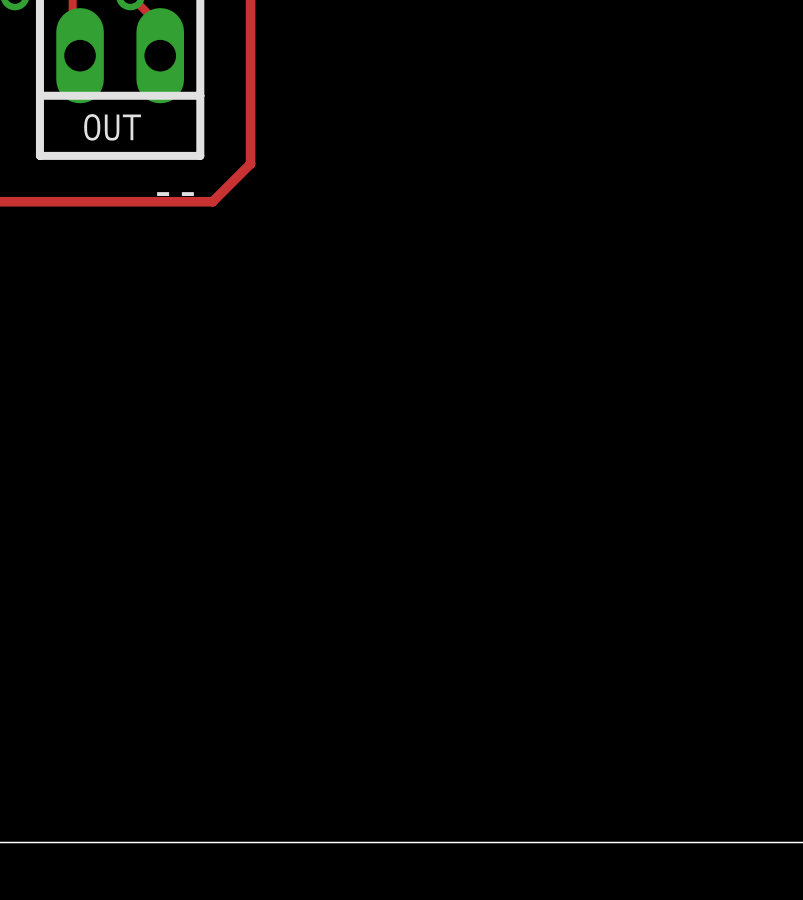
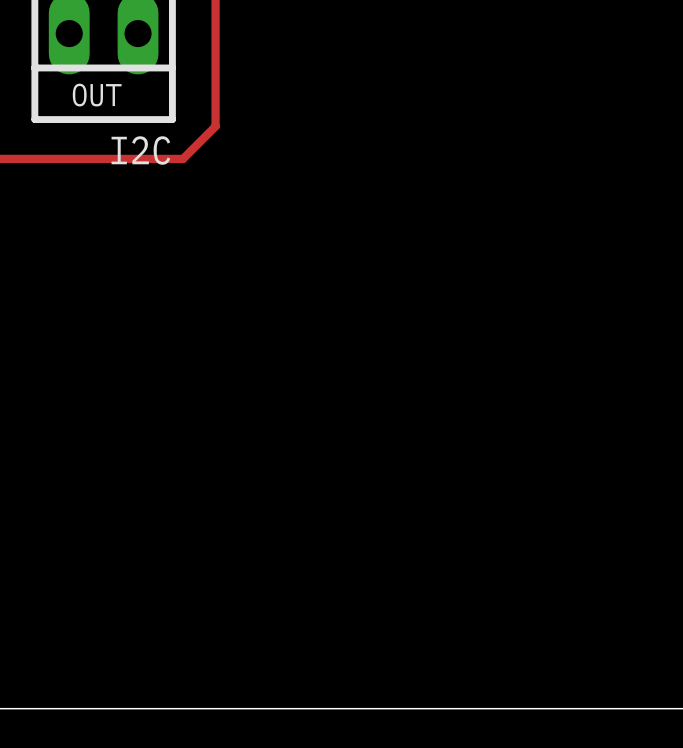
I2C name: -- (175, 194) -> I2C (140, 150)

